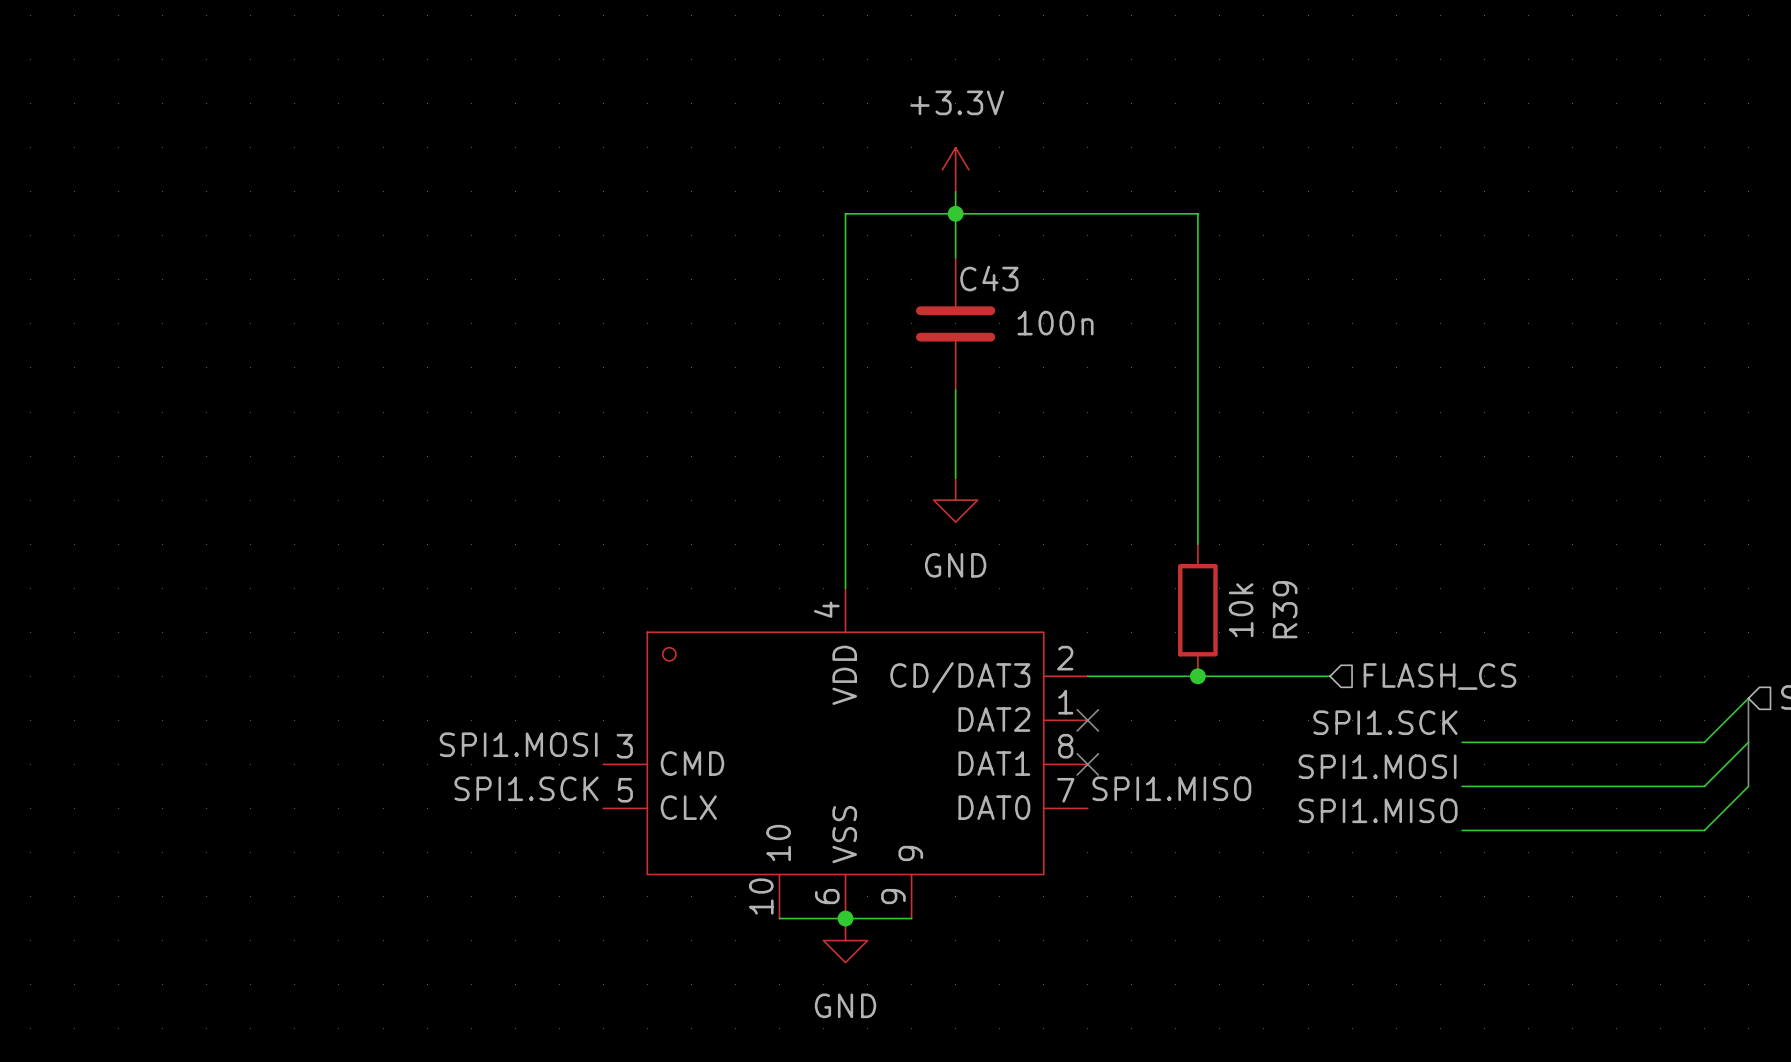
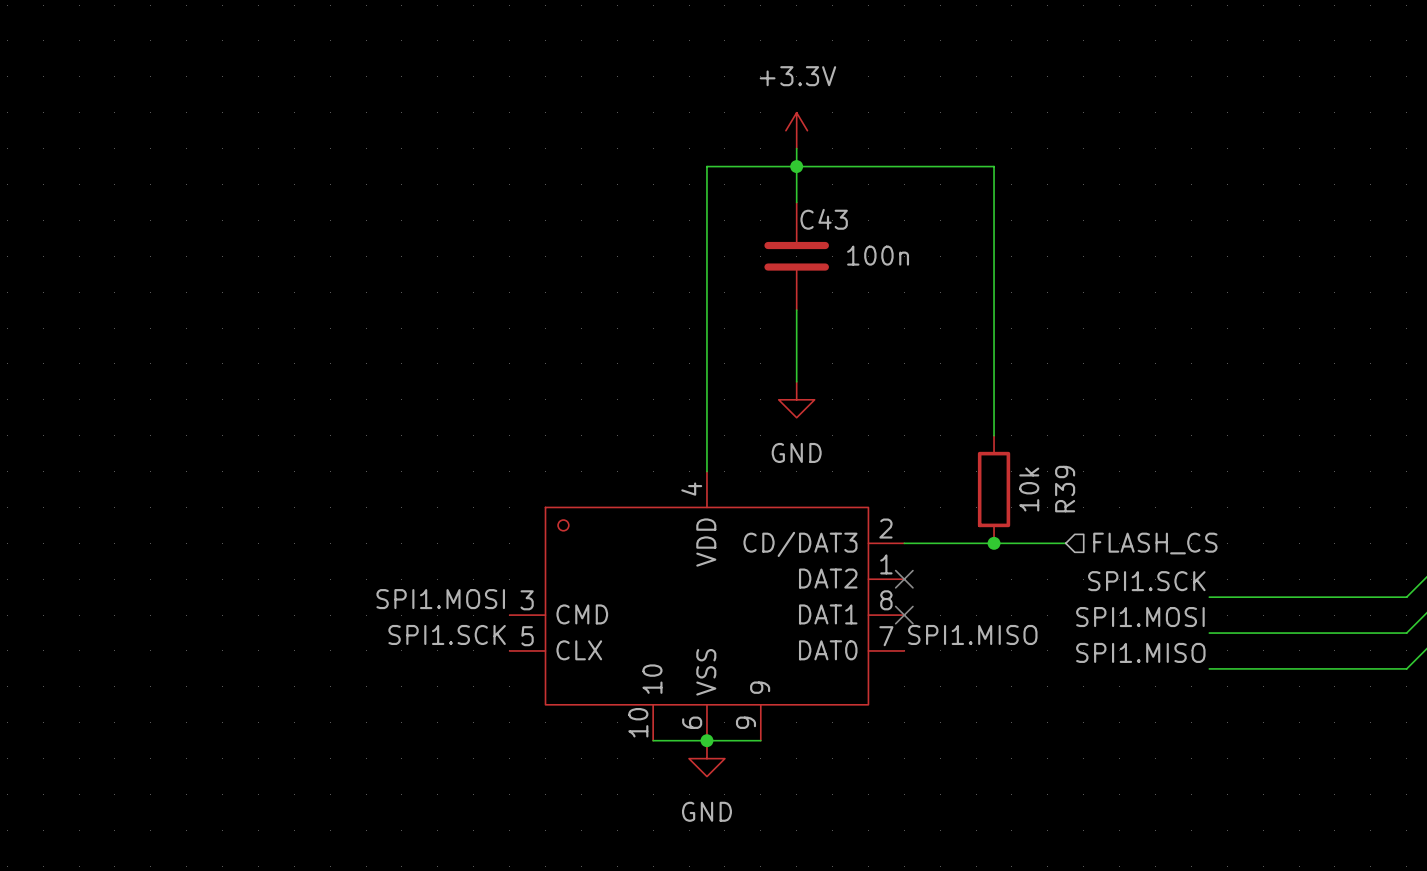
wire: (1285, 676) (1330, 676) -> none
hierarchical label position: FLASH_CS (1439, 676) -> FLASH_CS (1155, 543)

